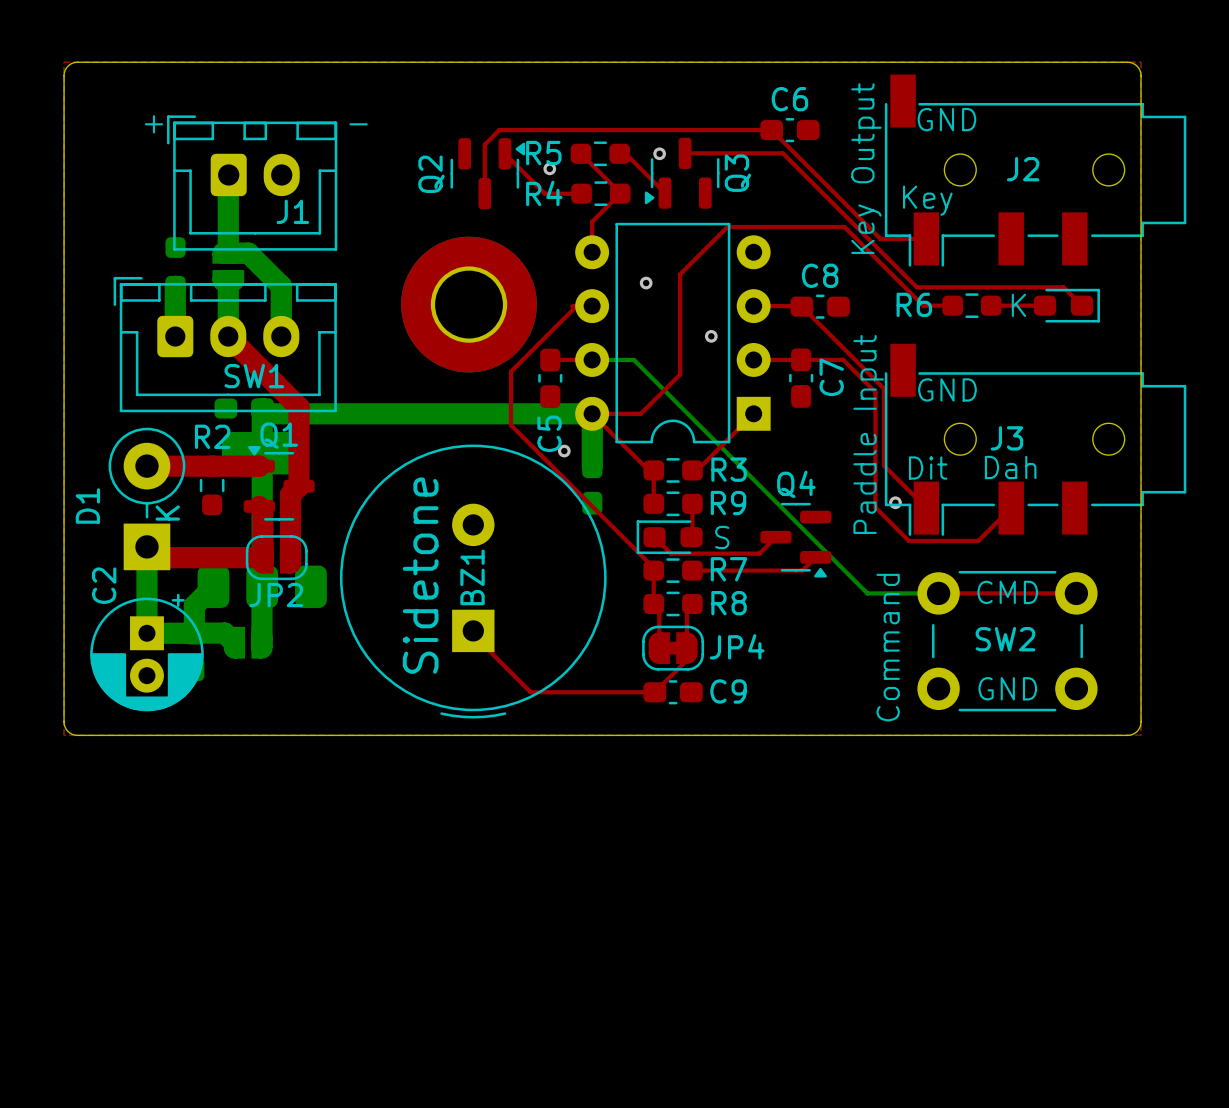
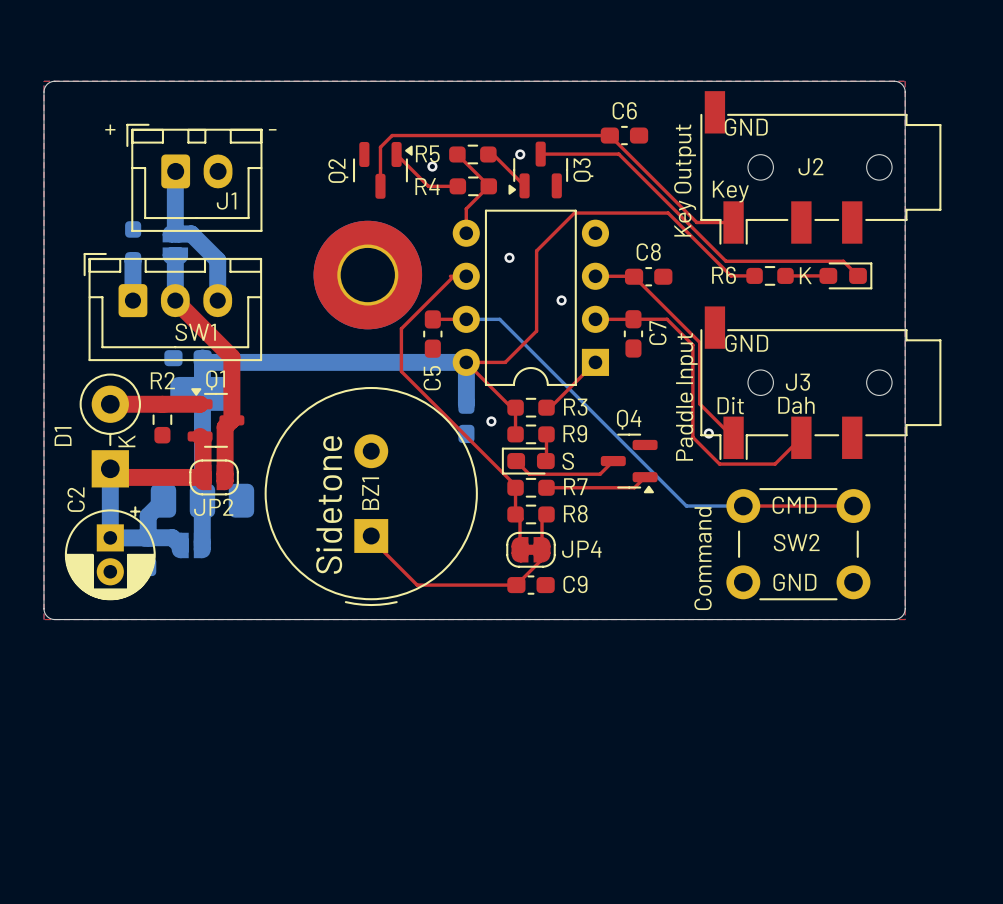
via position: (564, 451) -> (491, 421)

